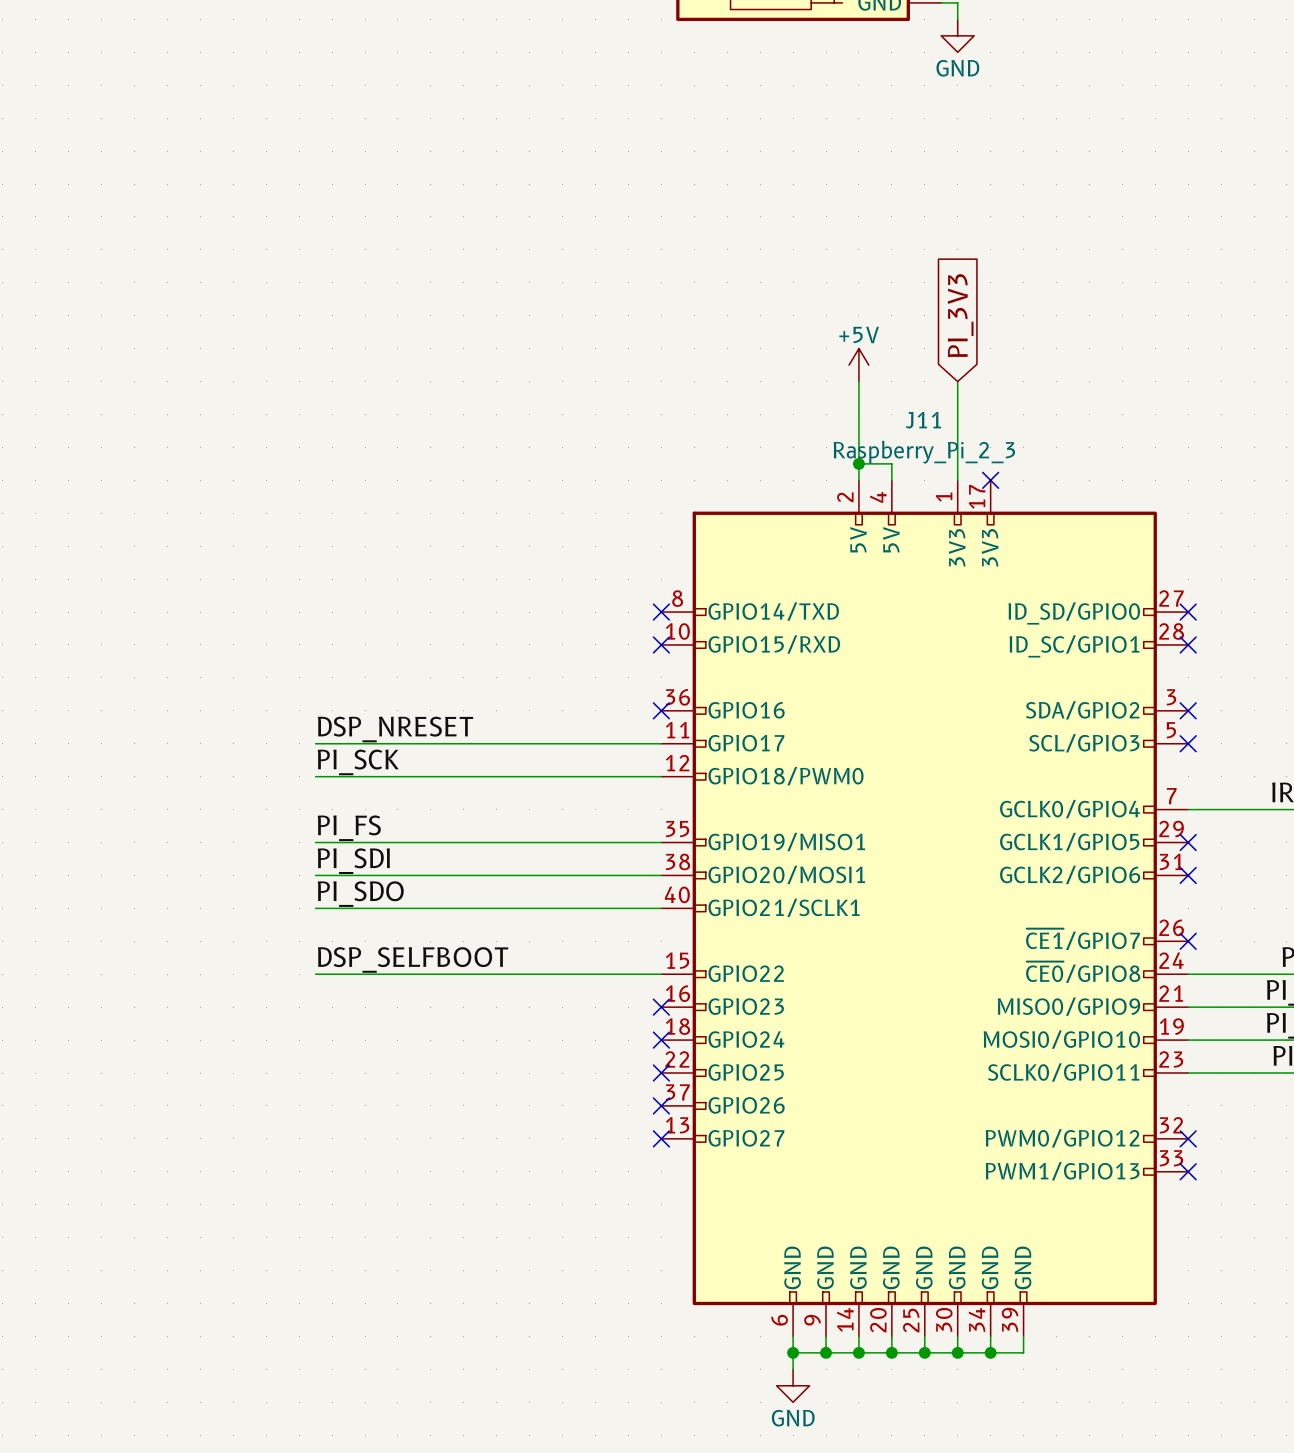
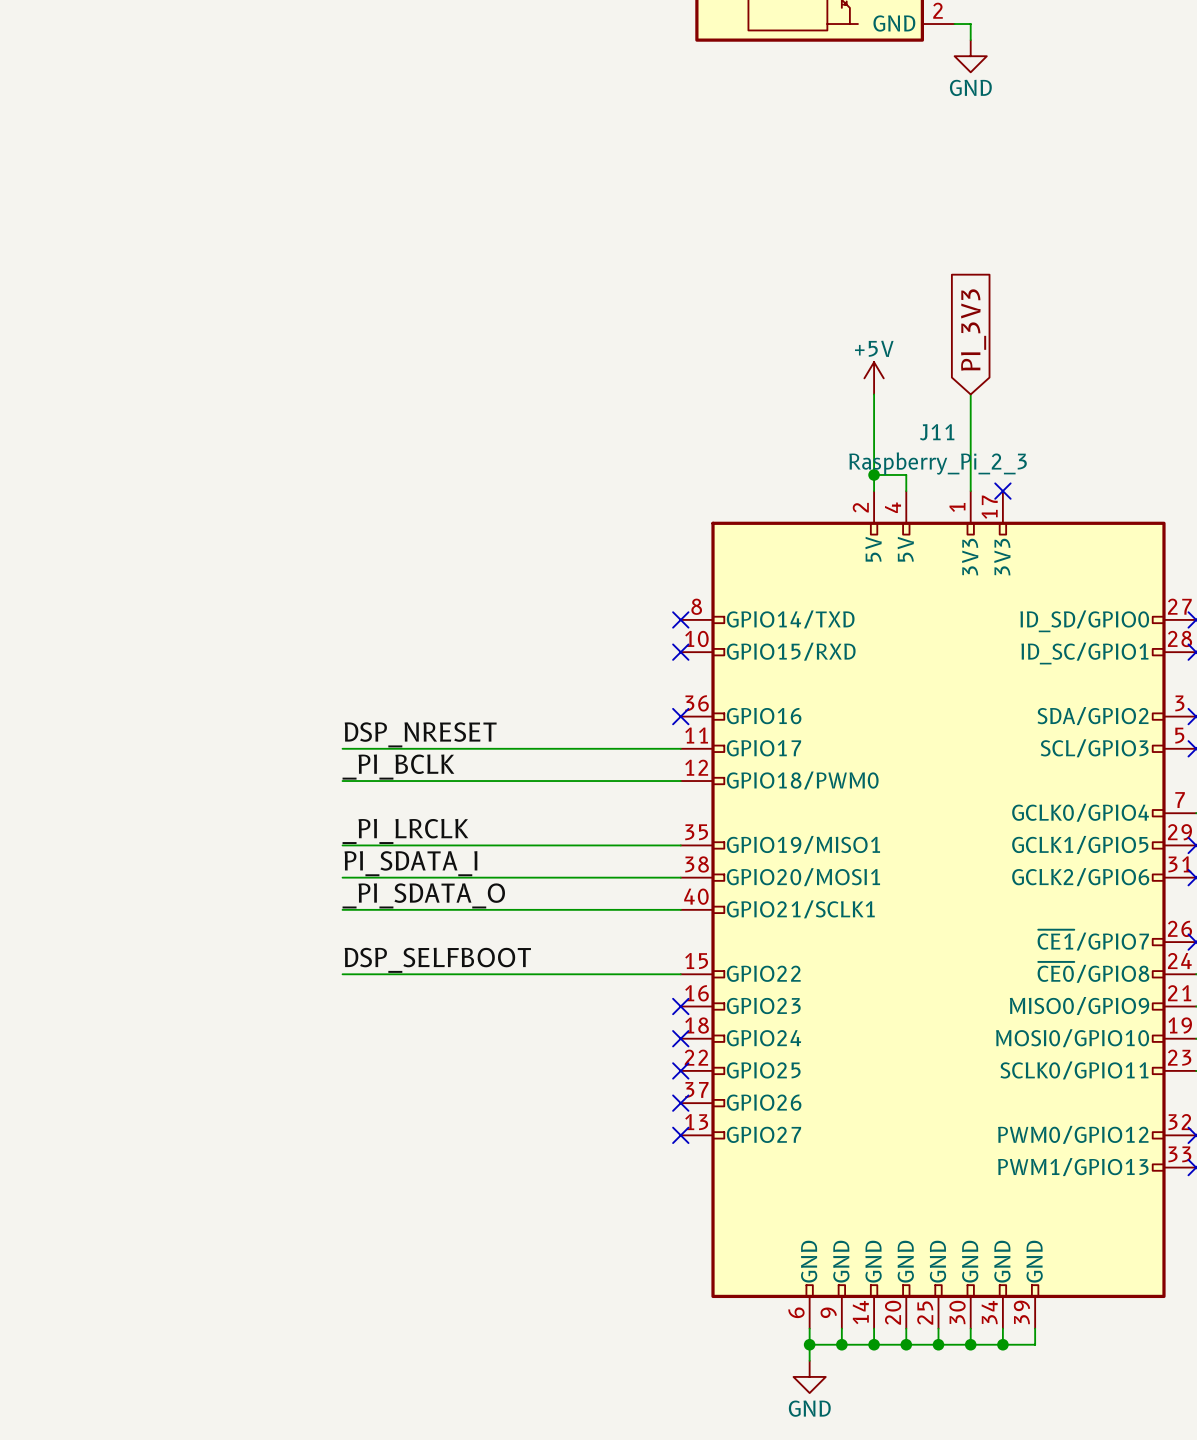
label: PI_SCK (358, 762) -> _PI_BCLK (398, 767)
label: PI_FS (349, 828) -> _PI_LRCLK (405, 831)
label: PI_SDI (353, 861) -> PI_SDATA_I (410, 863)
label: PI_SDO (360, 894) -> _PI_SDATA_O (423, 895)

